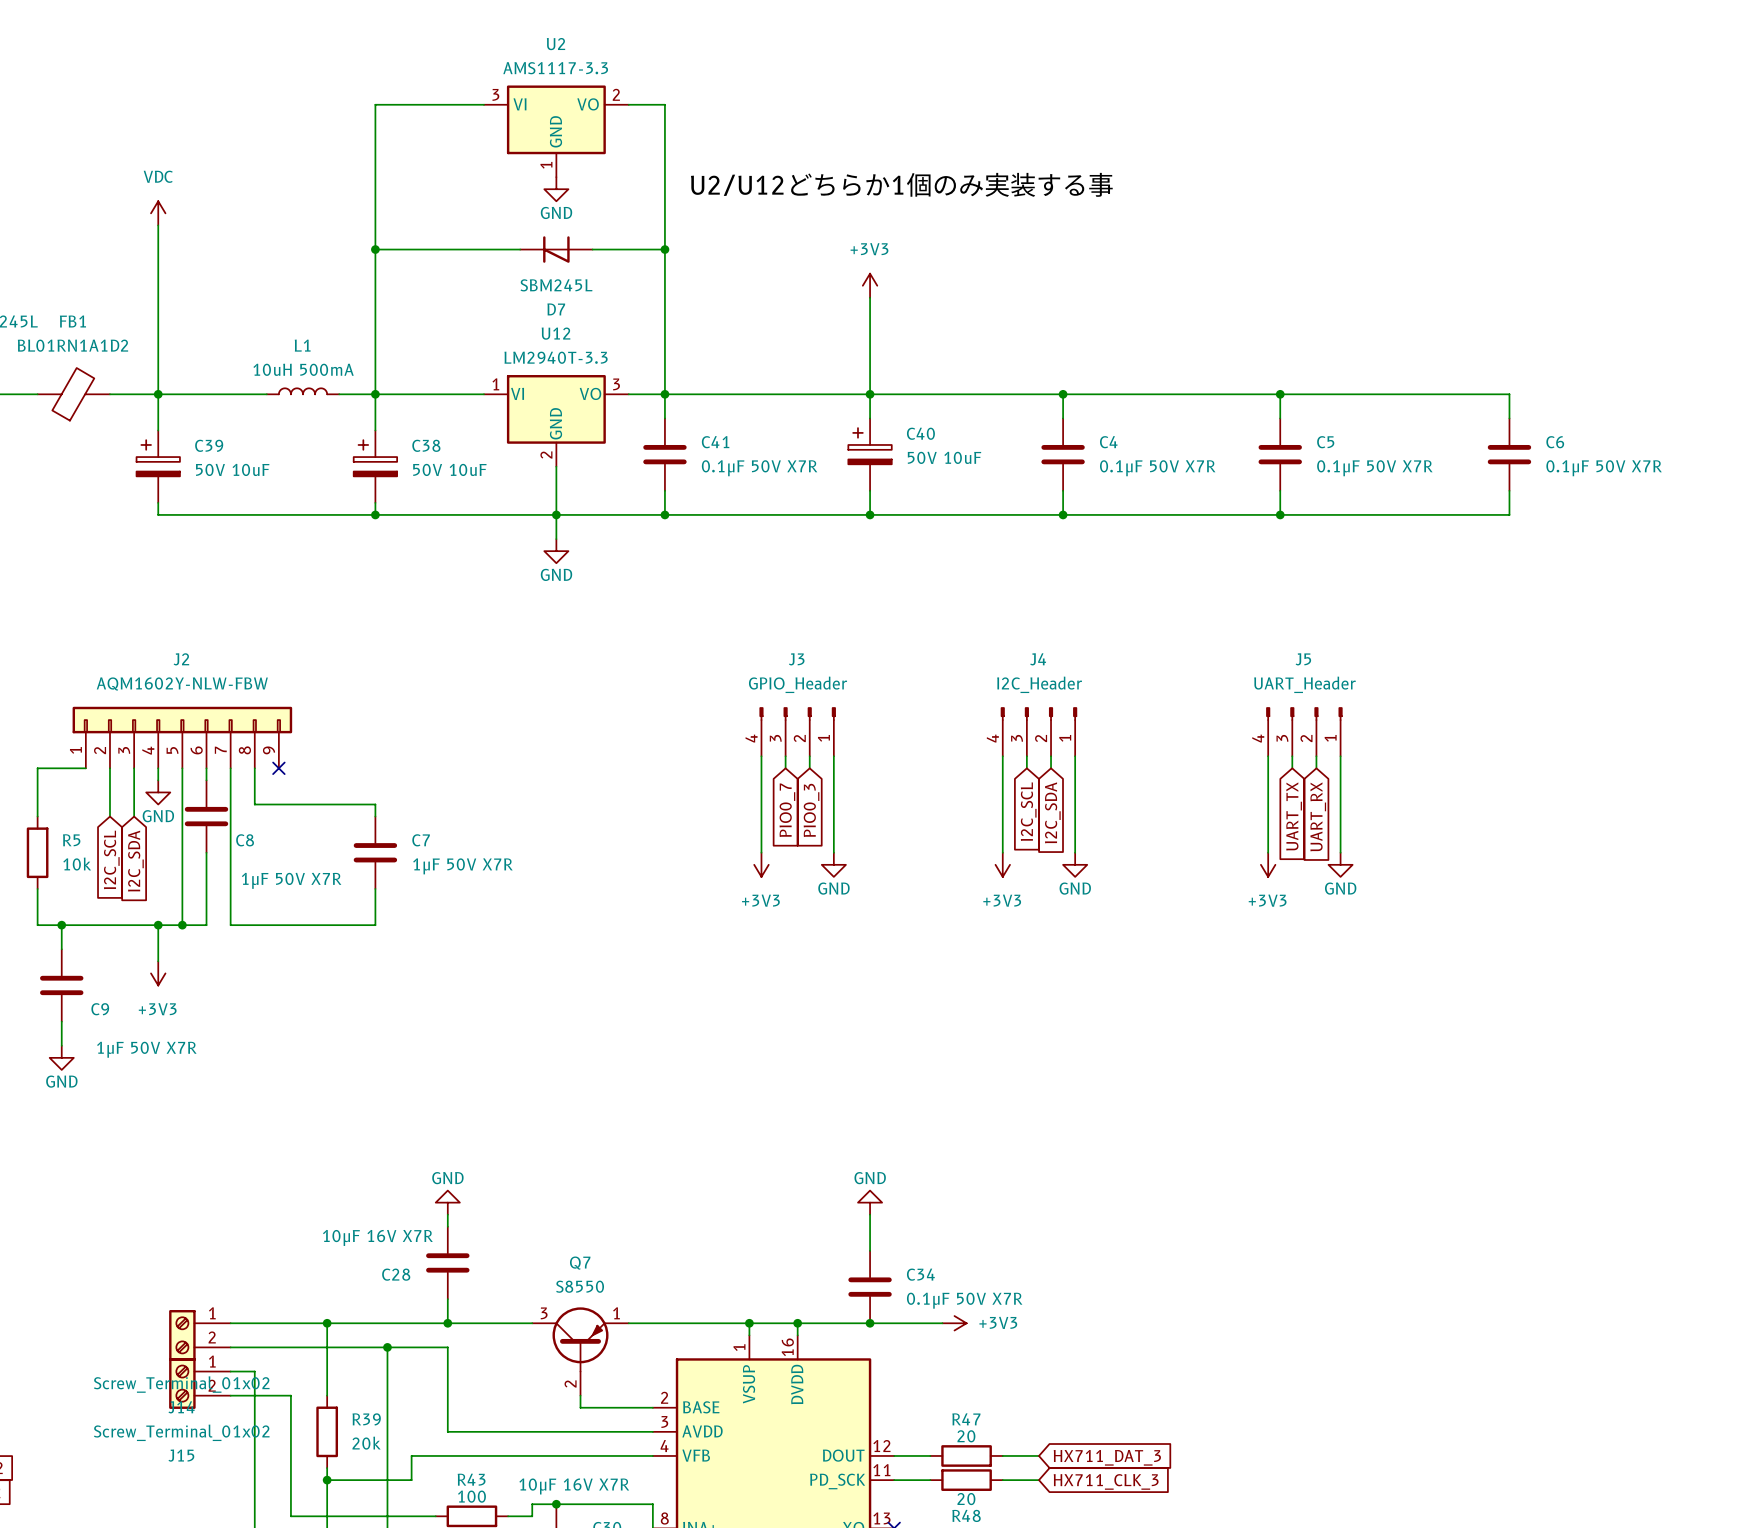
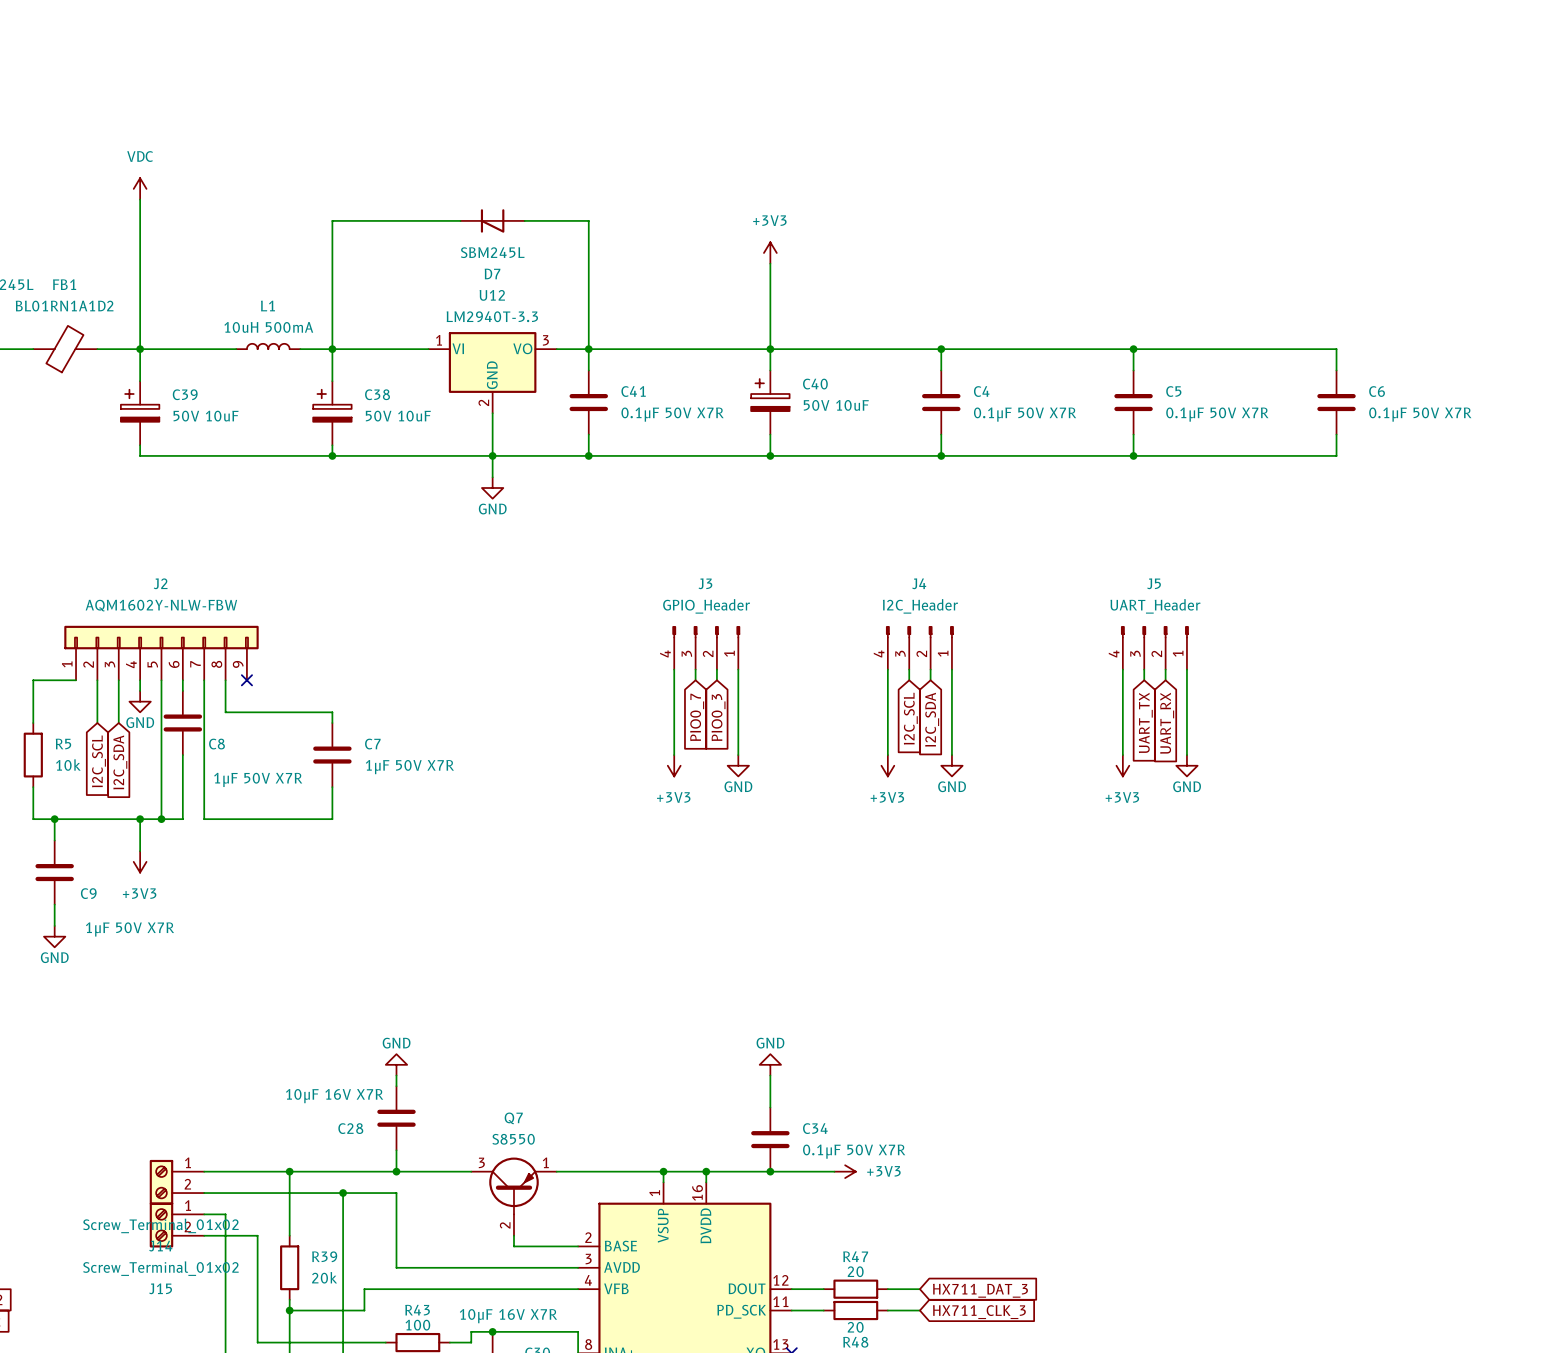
wire: (483, 104) (375, 104) (375, 249) -> none
wire: (628, 104) (664, 104) (664, 249) -> none
U2: AMS1117-3.3 (556, 131) -> none
label: U2/U12どちらか1個のみ実装する事 (901, 184) -> none
power symbol: GND (556, 189) -> none
junction: (375, 249) -> none
junction: (664, 249) -> none

